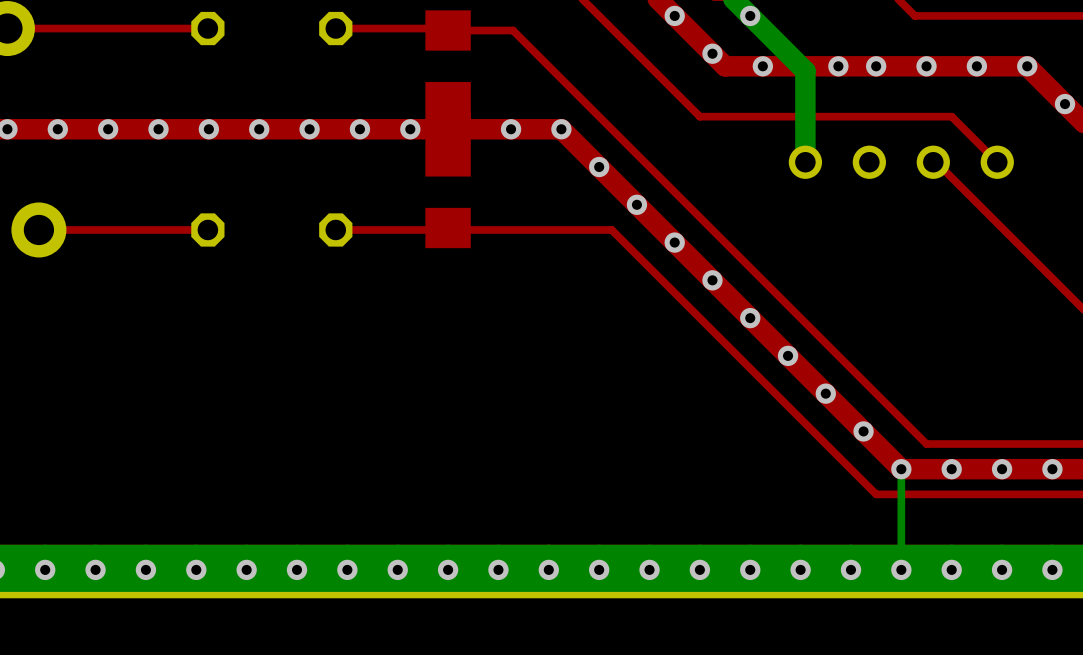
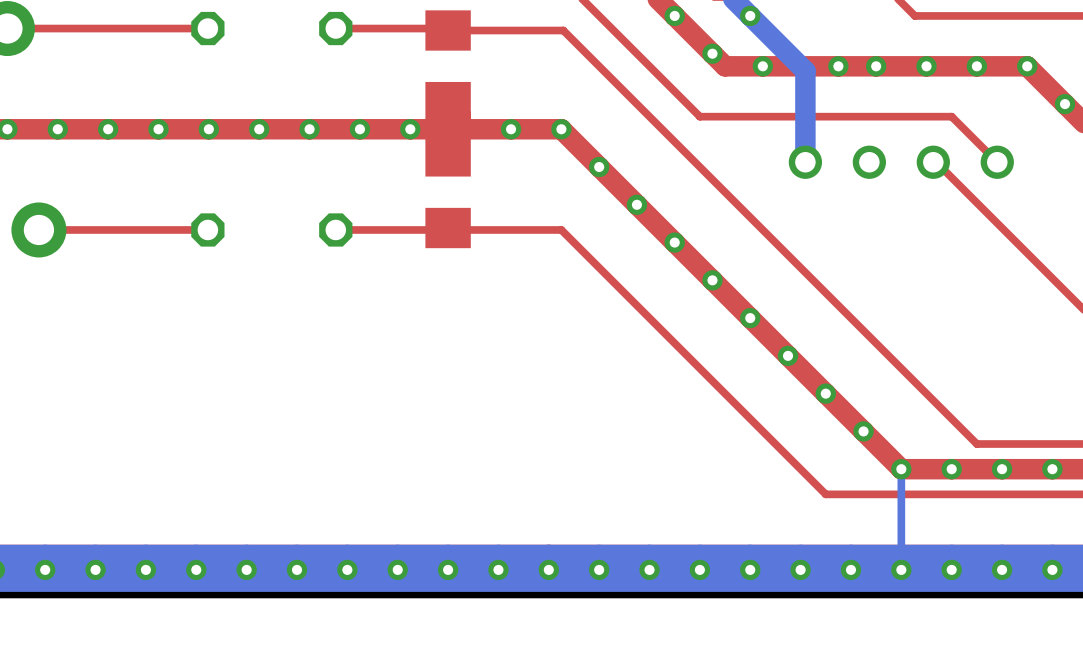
top track: (513, 30) (926, 444) (976, 444) -> (513, 30) (563, 30) (976, 444)
top track: (561, 229) (611, 229) (876, 494) -> (561, 229) (825, 494) (876, 494)

